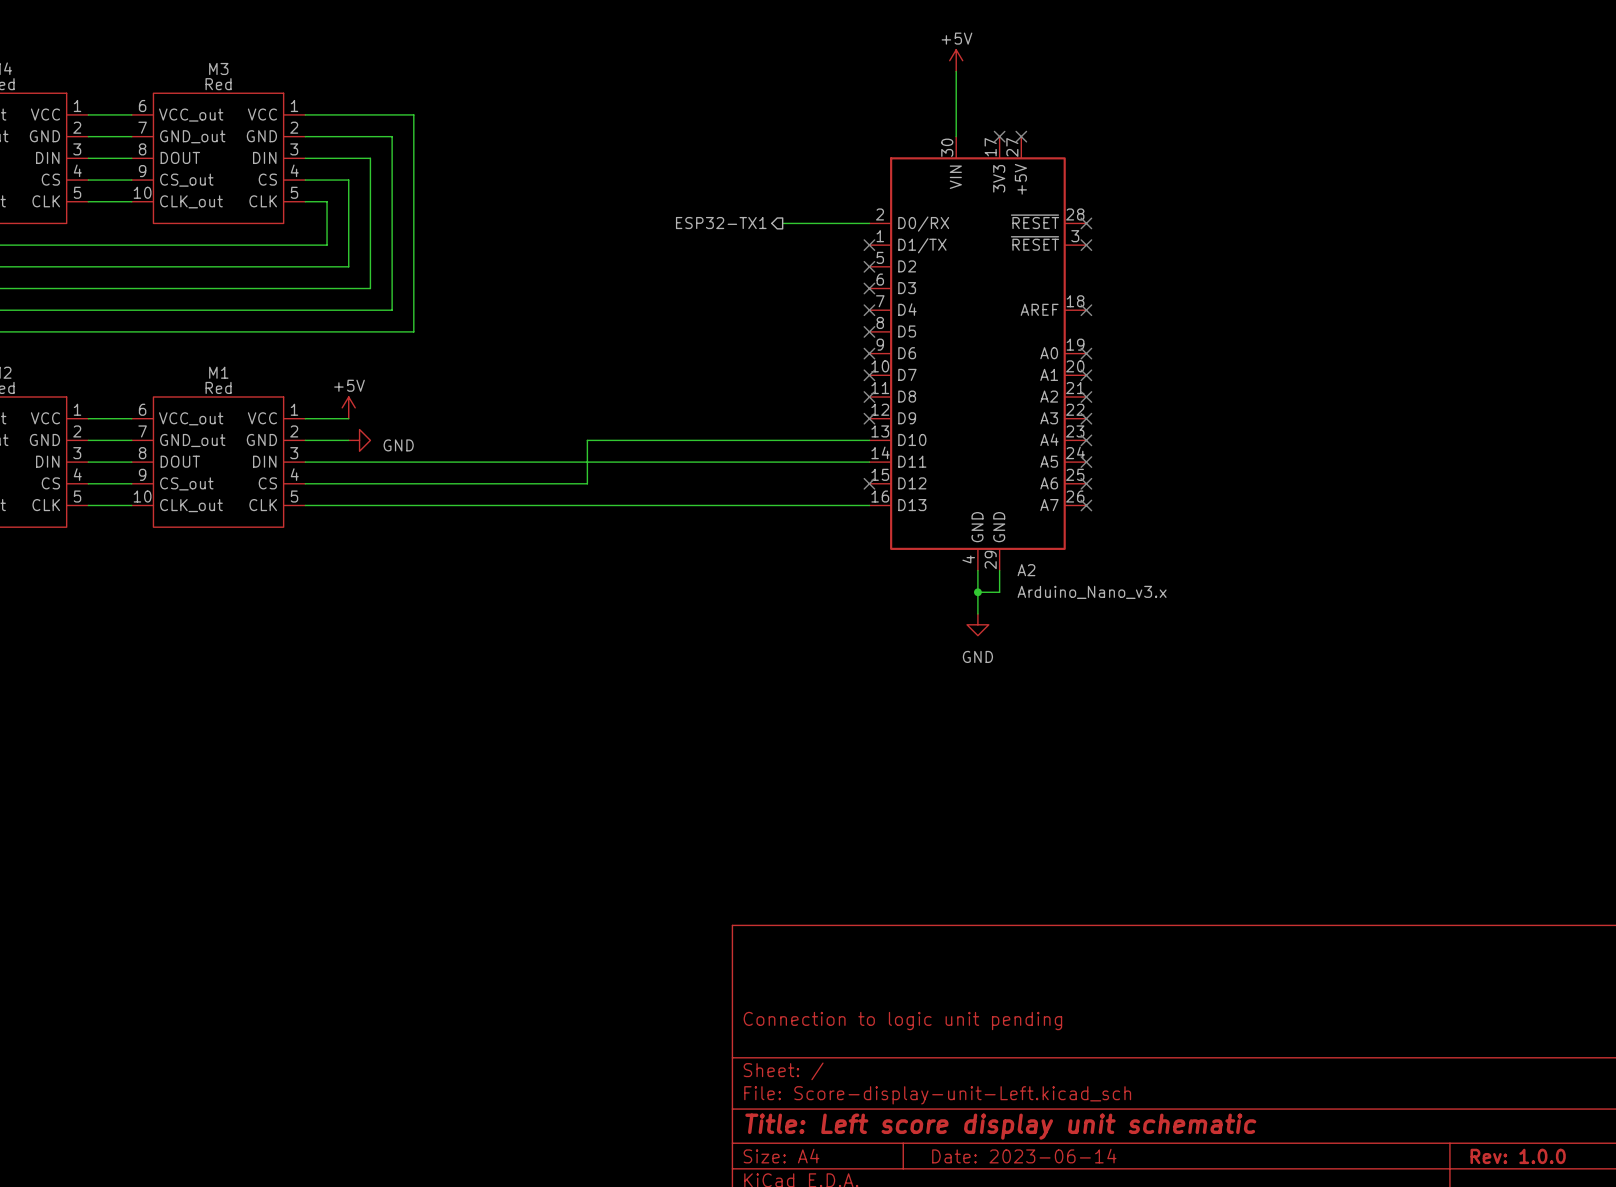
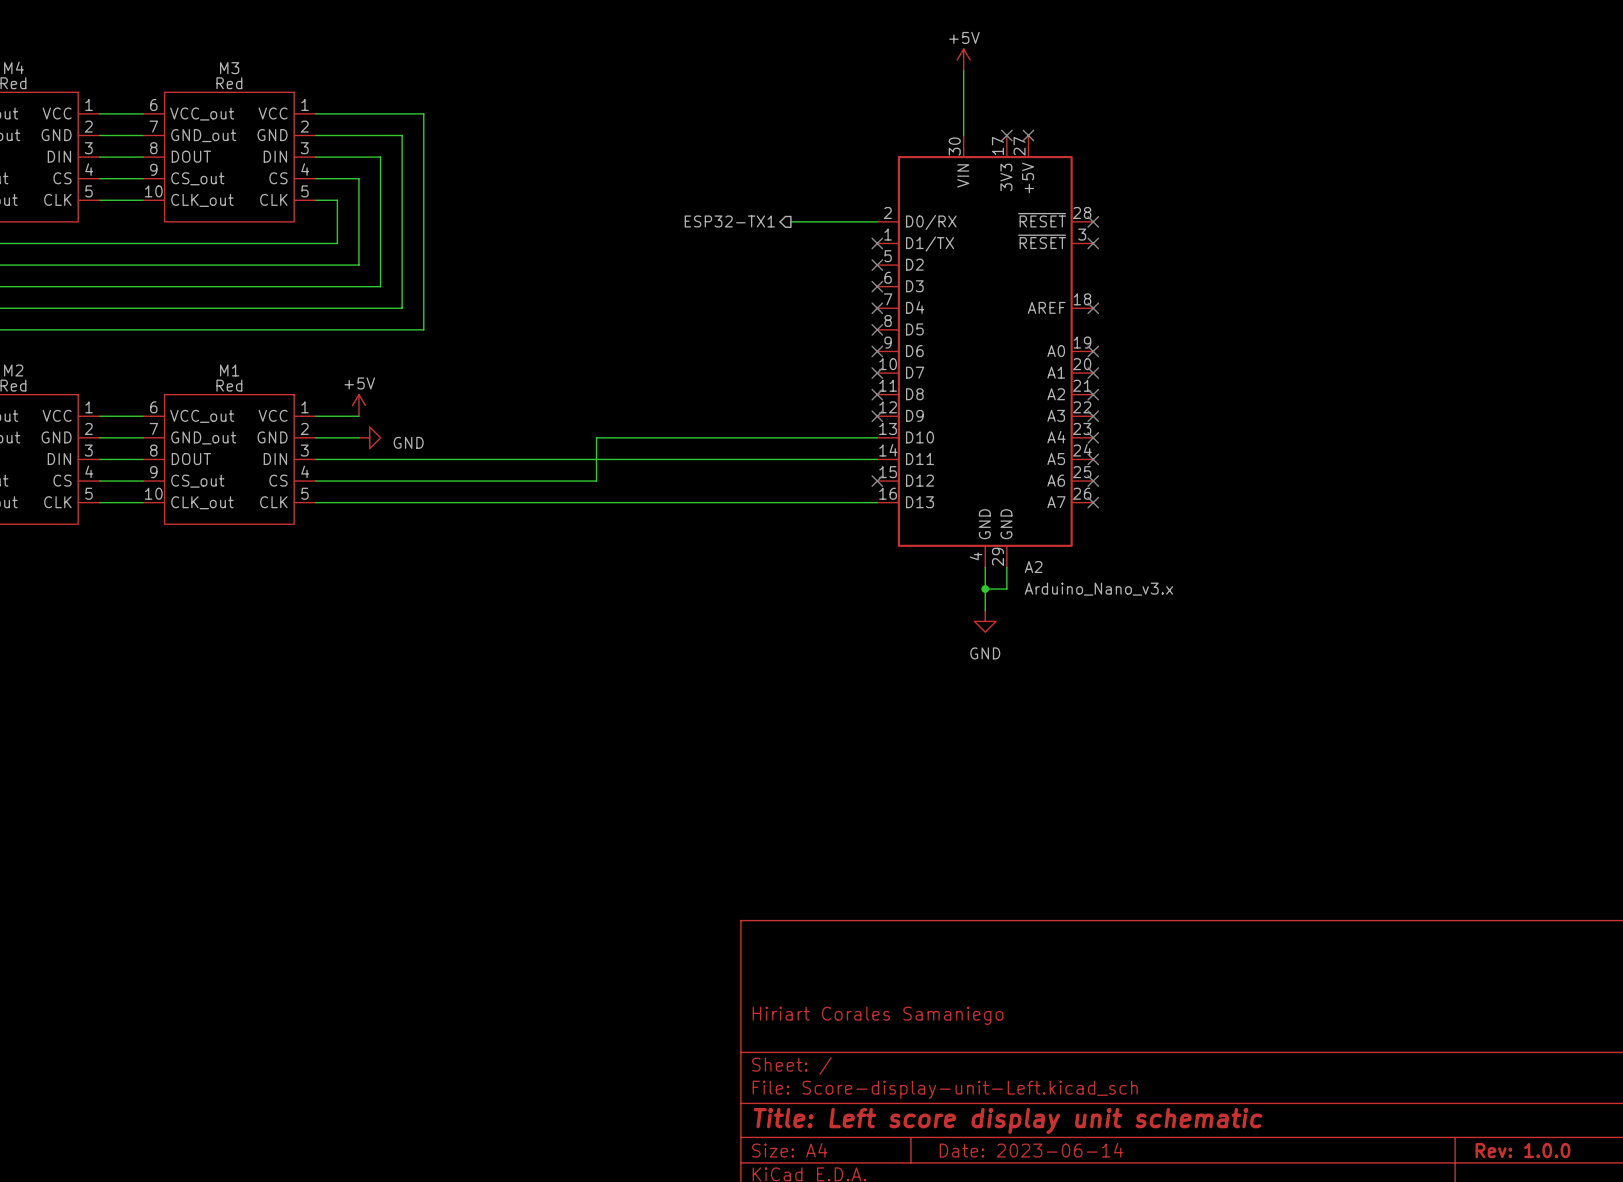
title block: Connection to logic unit pending (902, 1021) -> Hiriart Corales Samaniego (878, 1015)

